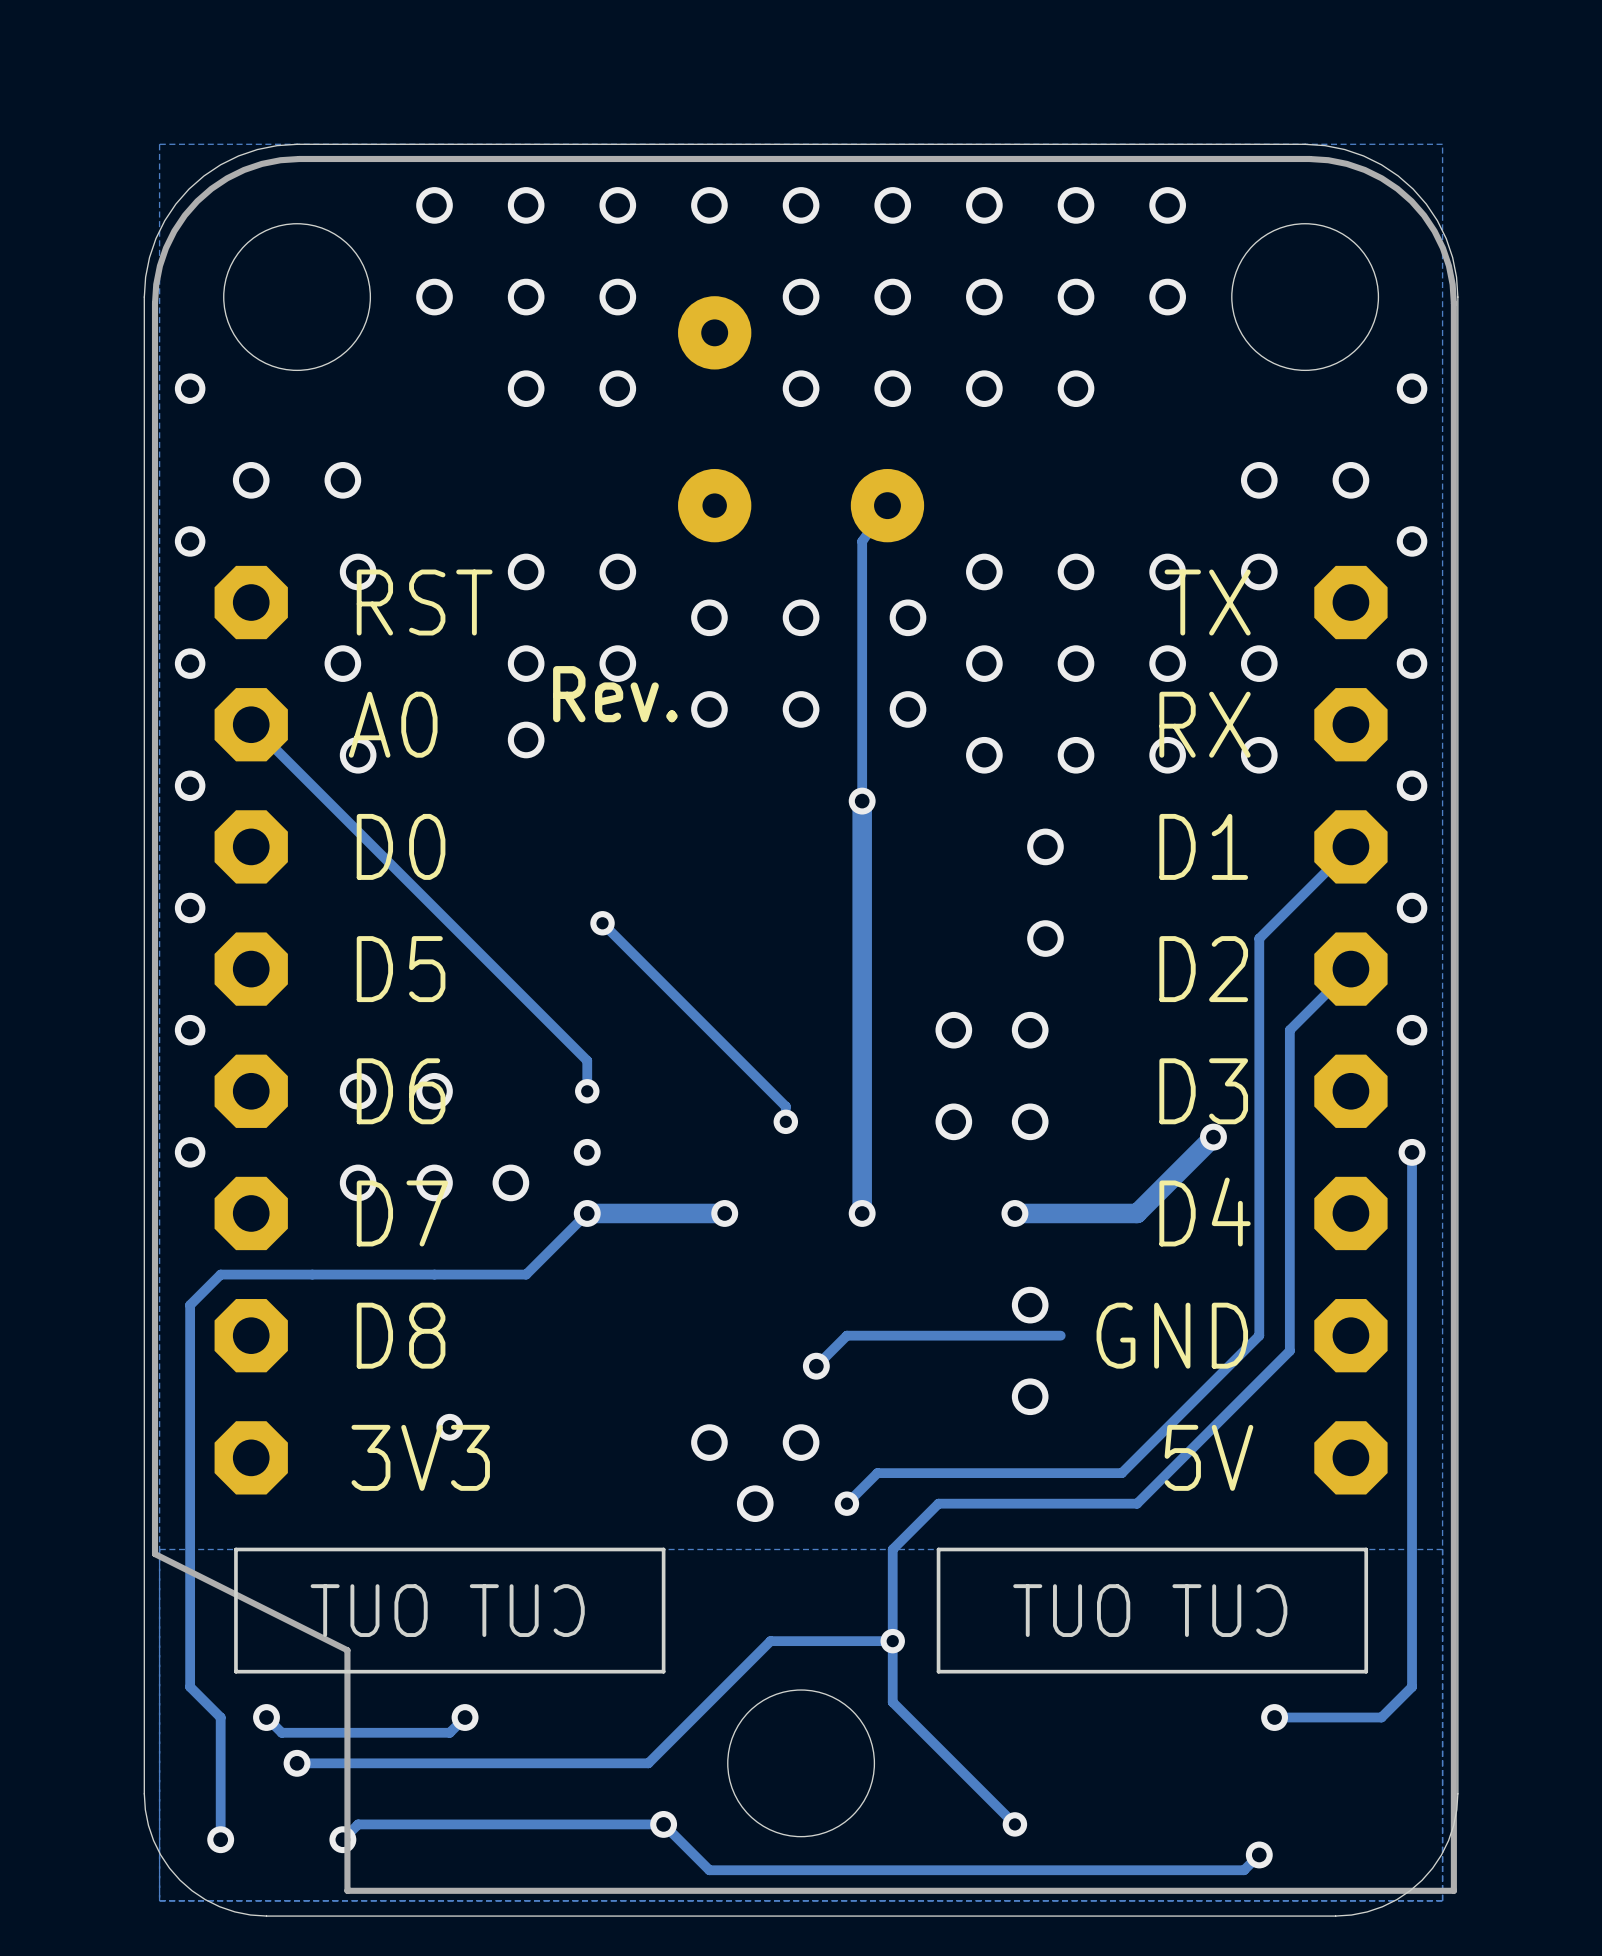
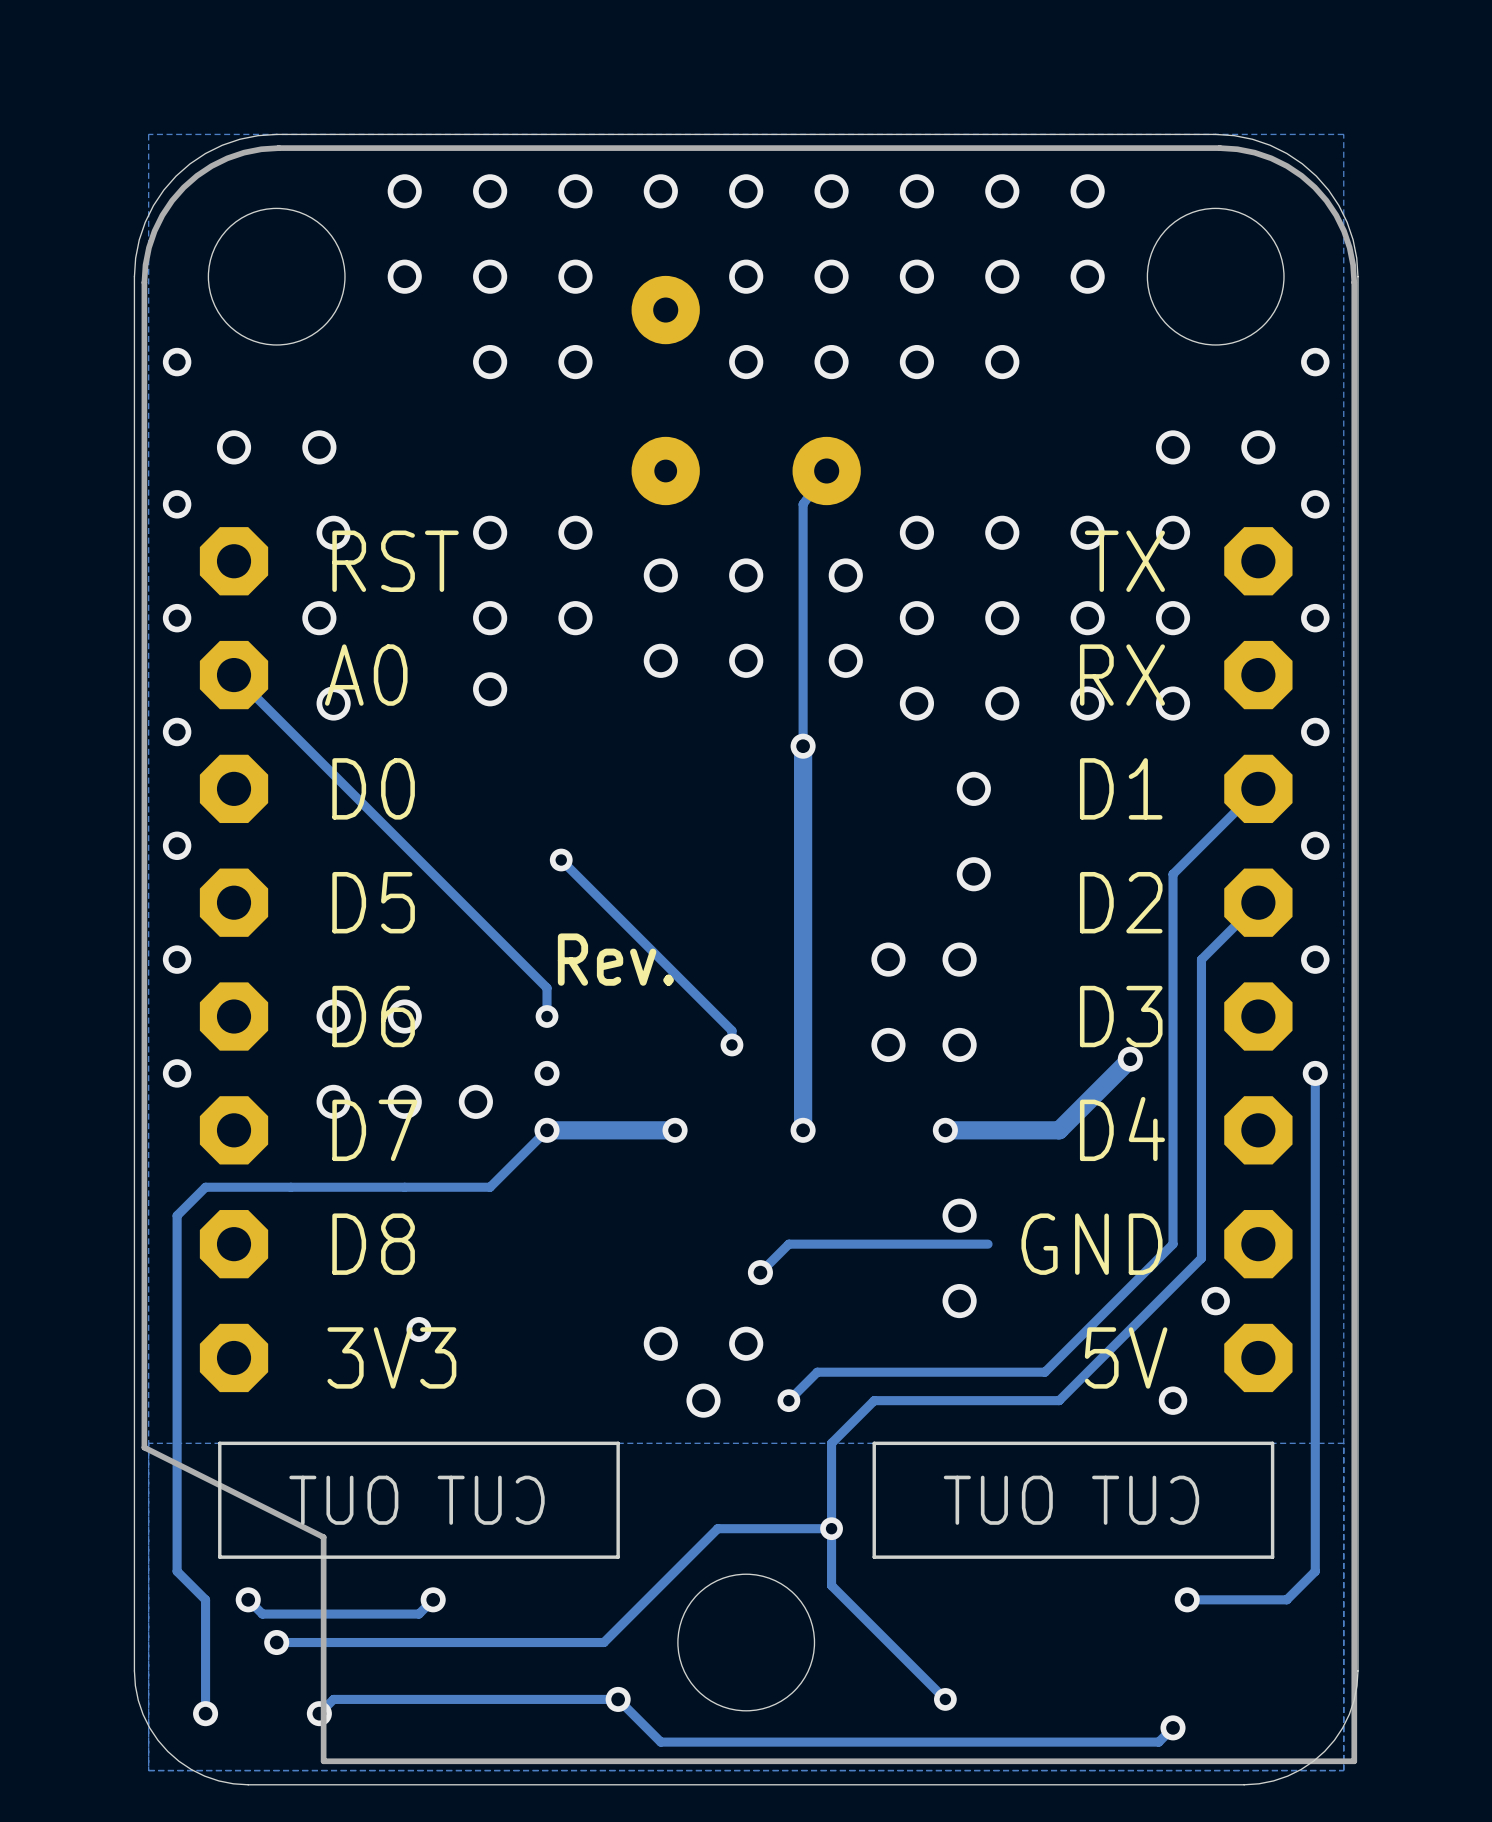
drawing position: (615, 694) -> (615, 959)
via: none -> (1215, 1301)
via: none -> (1173, 1400)

